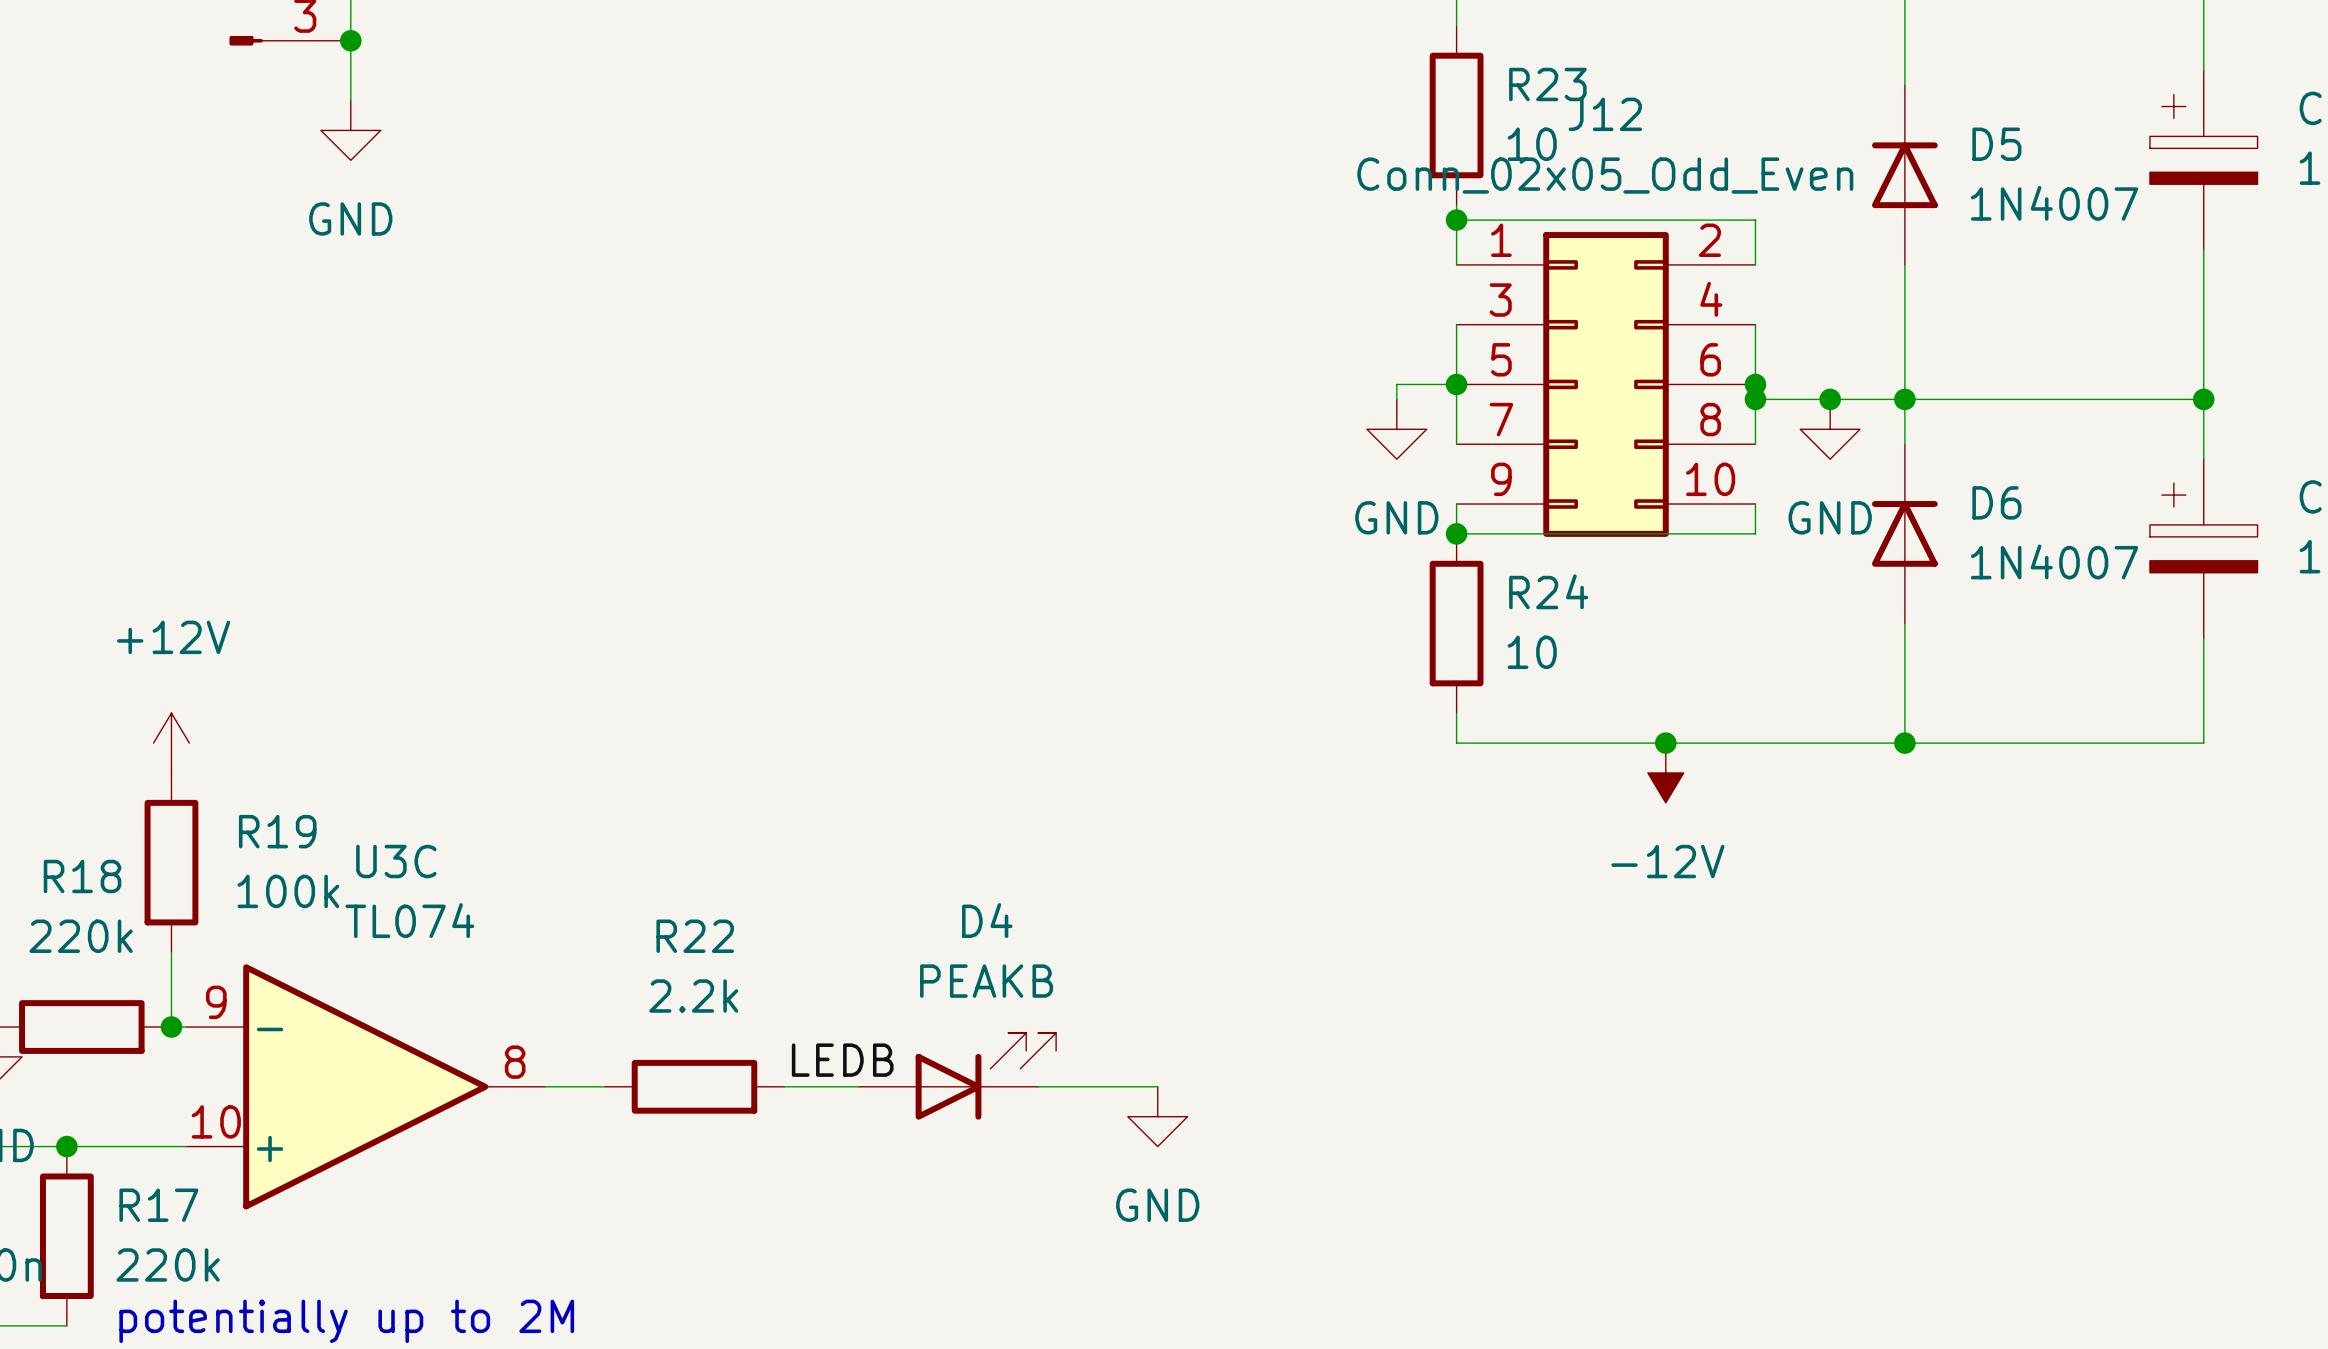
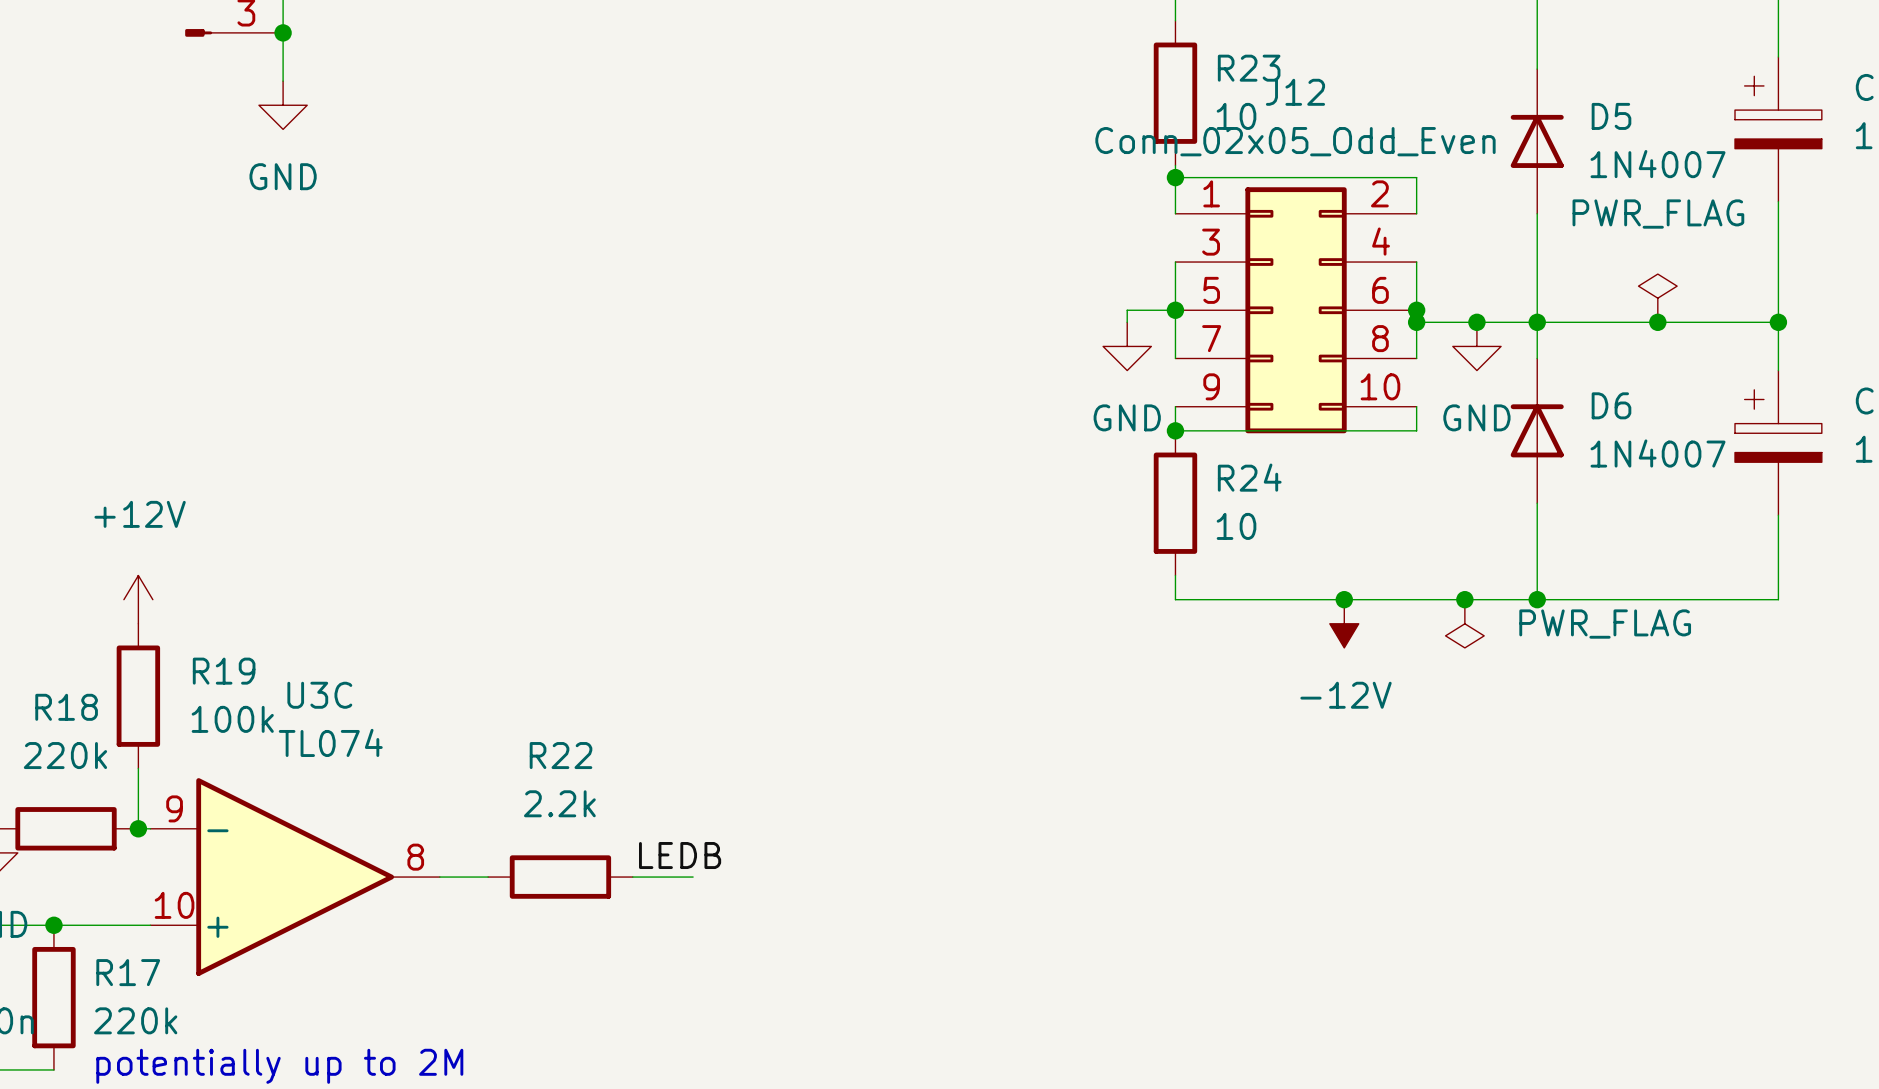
power symbol: none -> PWR_FLAG (1657, 298)
junction: none -> (1657, 322)
junction: none -> (1464, 599)
power symbol: none -> PWR_FLAG (1464, 623)
D4: PEAKB (957, 1076) -> none
wire: (1038, 1086) (1157, 1086) -> none
power symbol: GND (1157, 1116) -> none

